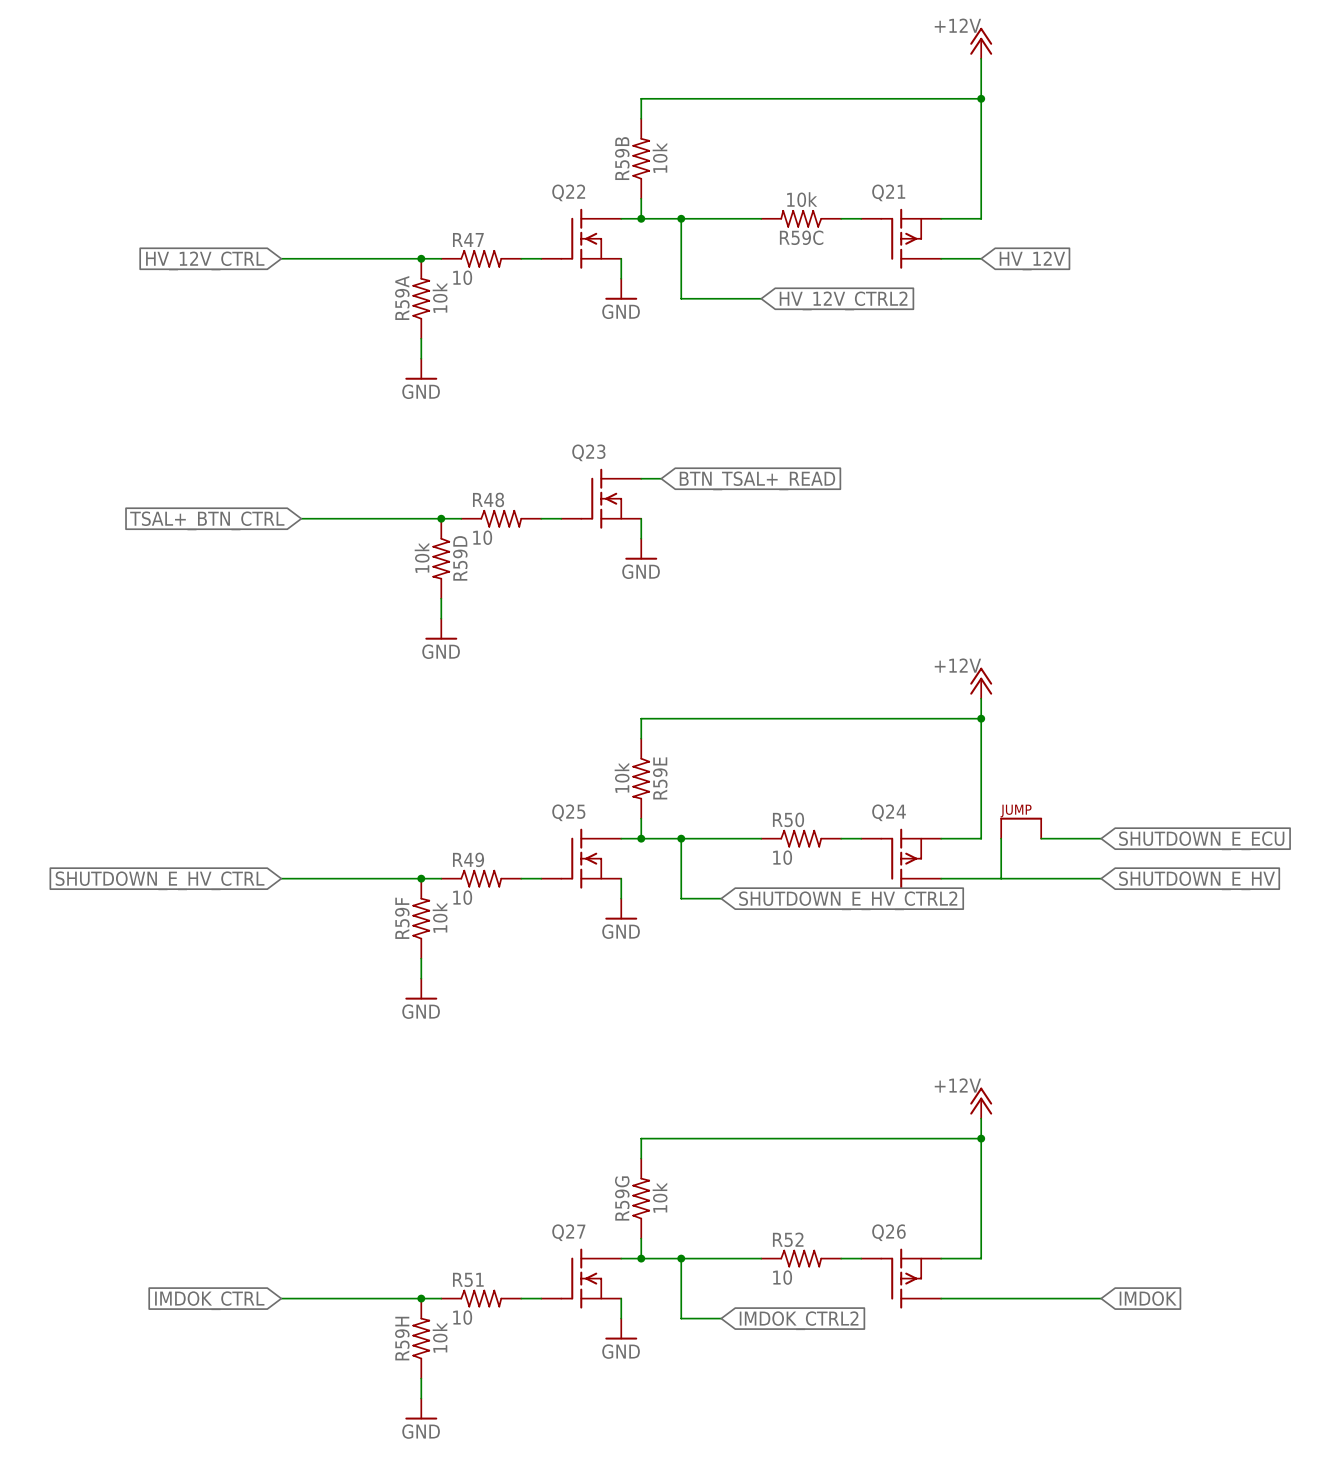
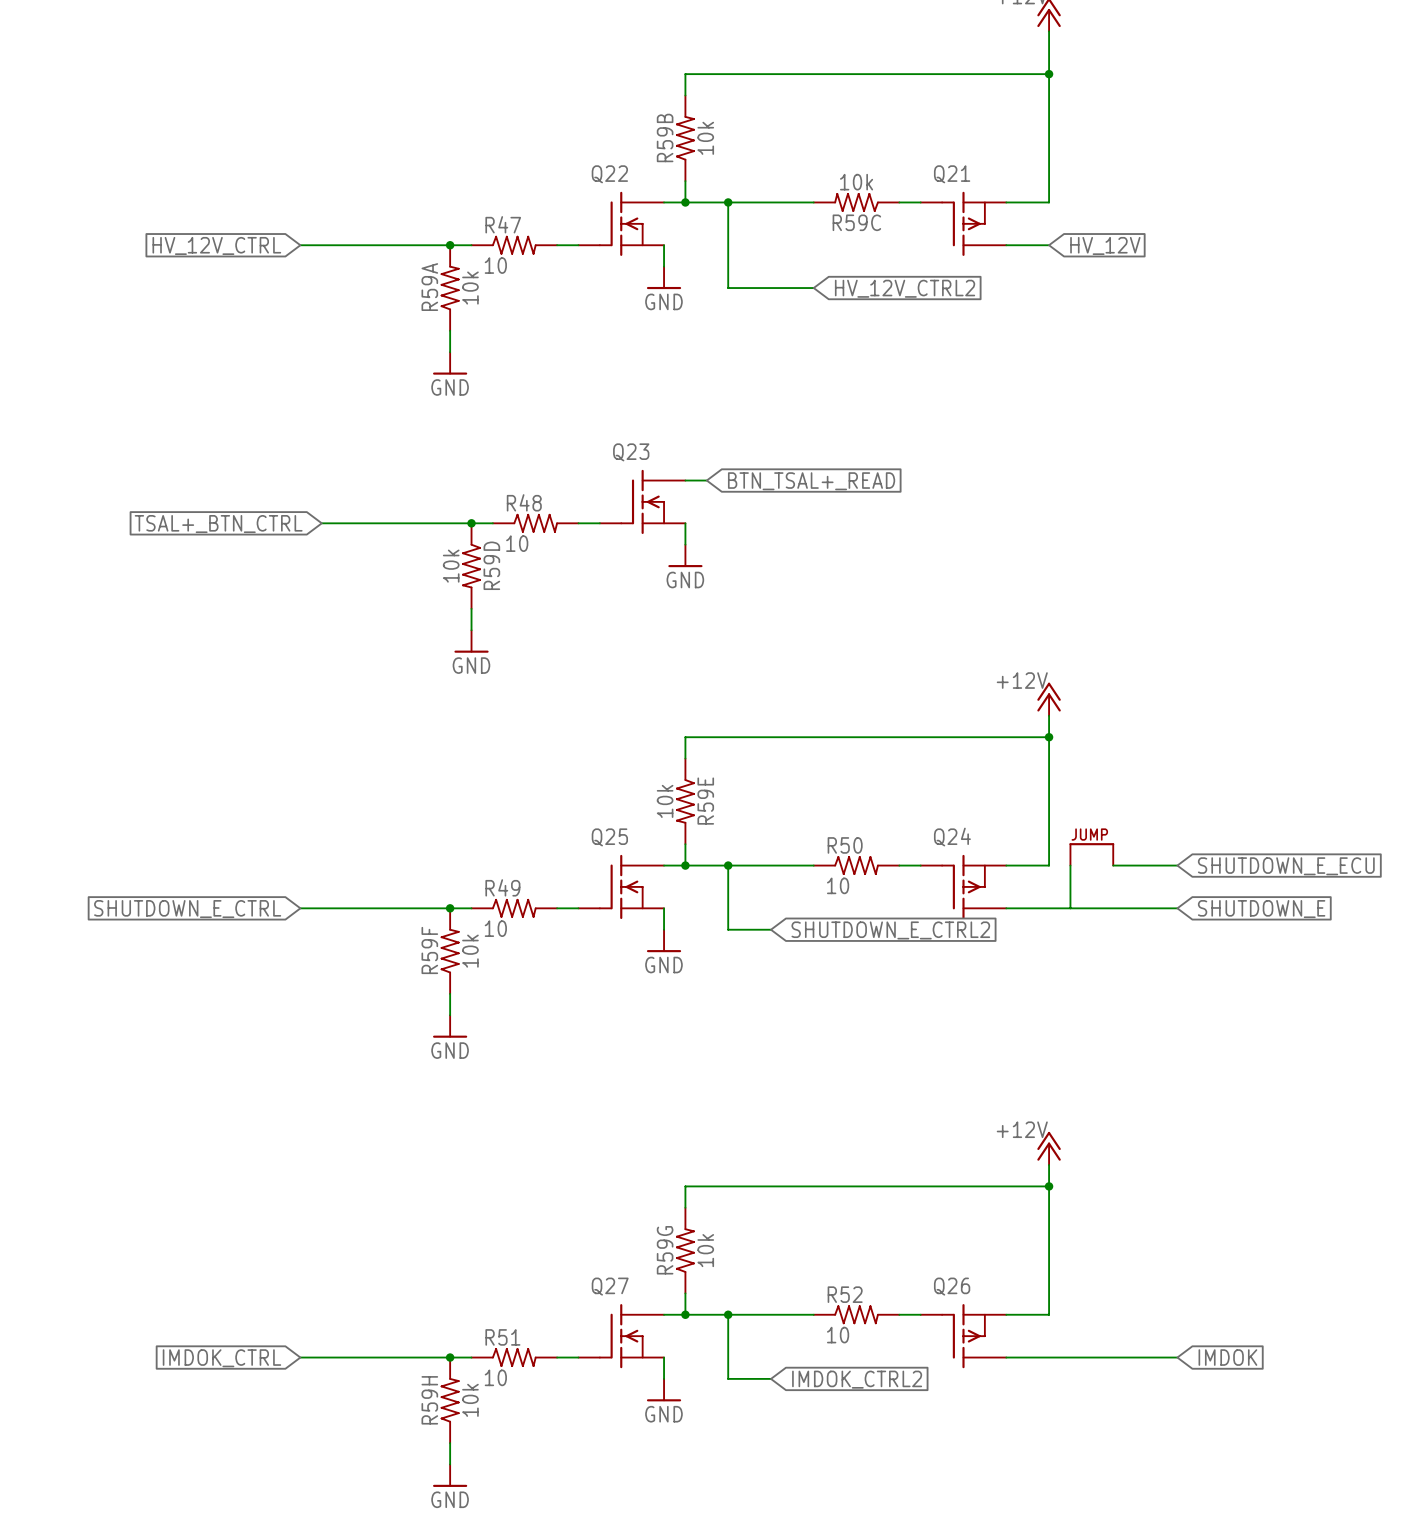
global label: SHUTDOWN_E_HV_CTRL (160, 880) -> SHUTDOWN_E_CTRL (187, 909)
global label: SHUTDOWN_E_HV (1197, 880) -> SHUTDOWN_E (1261, 909)
global label: SHUTDOWN_E_HV_CTRL2 (848, 900) -> SHUTDOWN_E_CTRL2 (890, 930)

